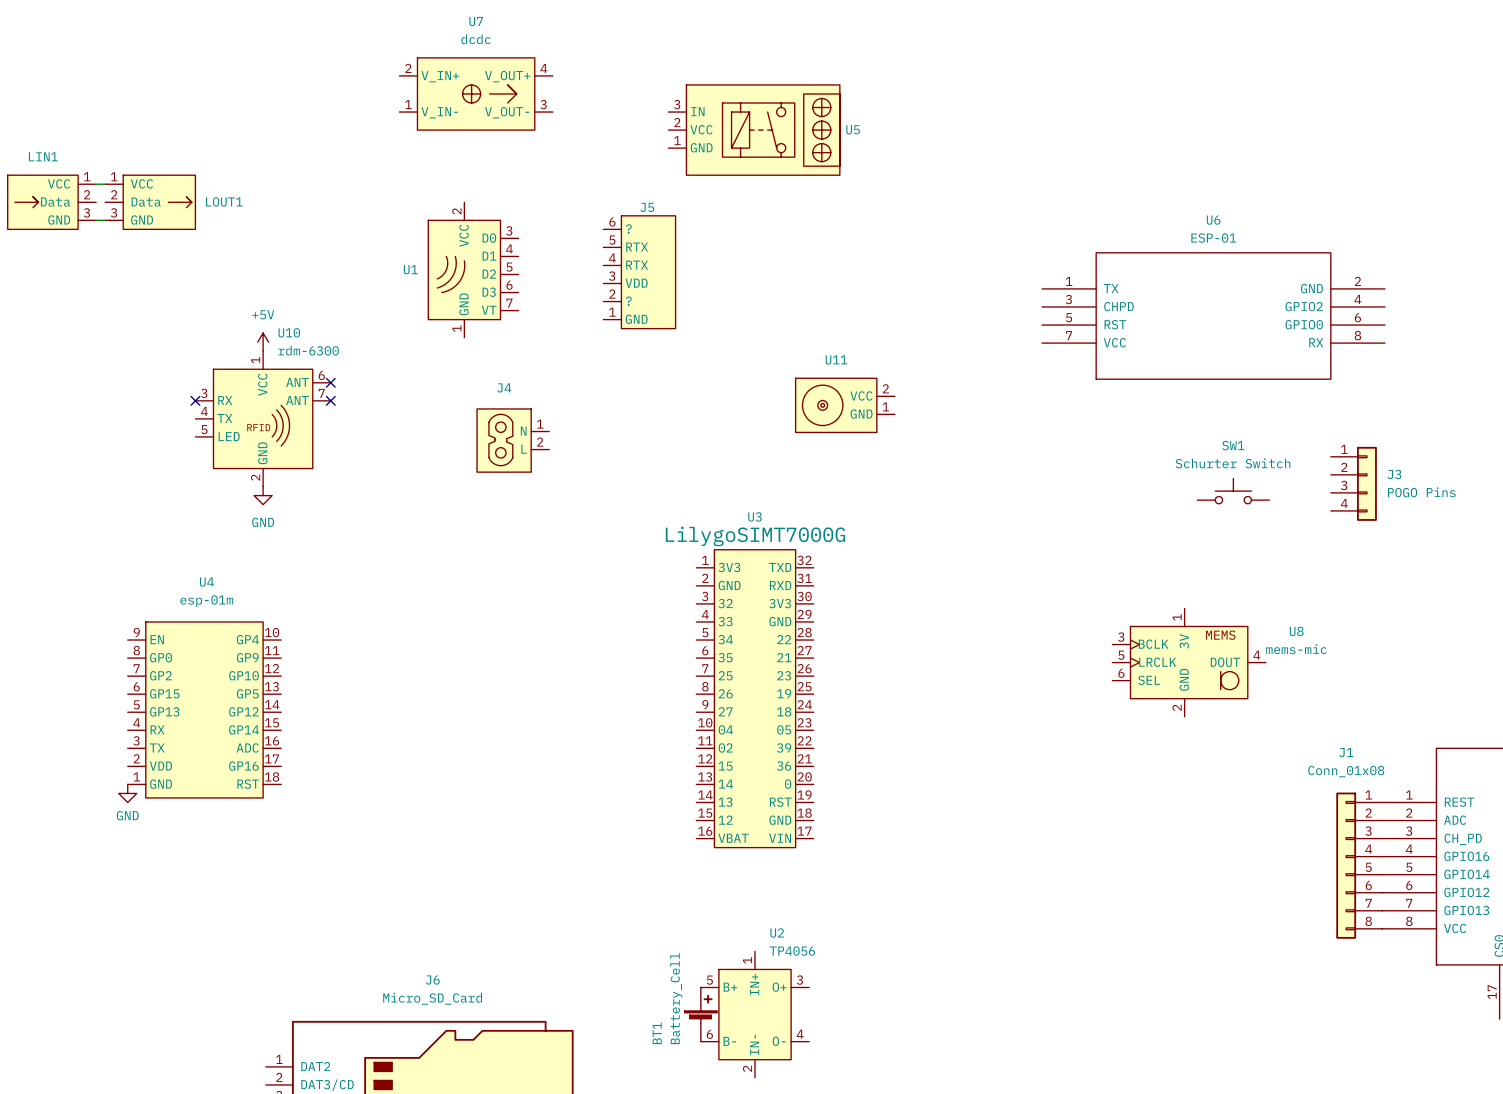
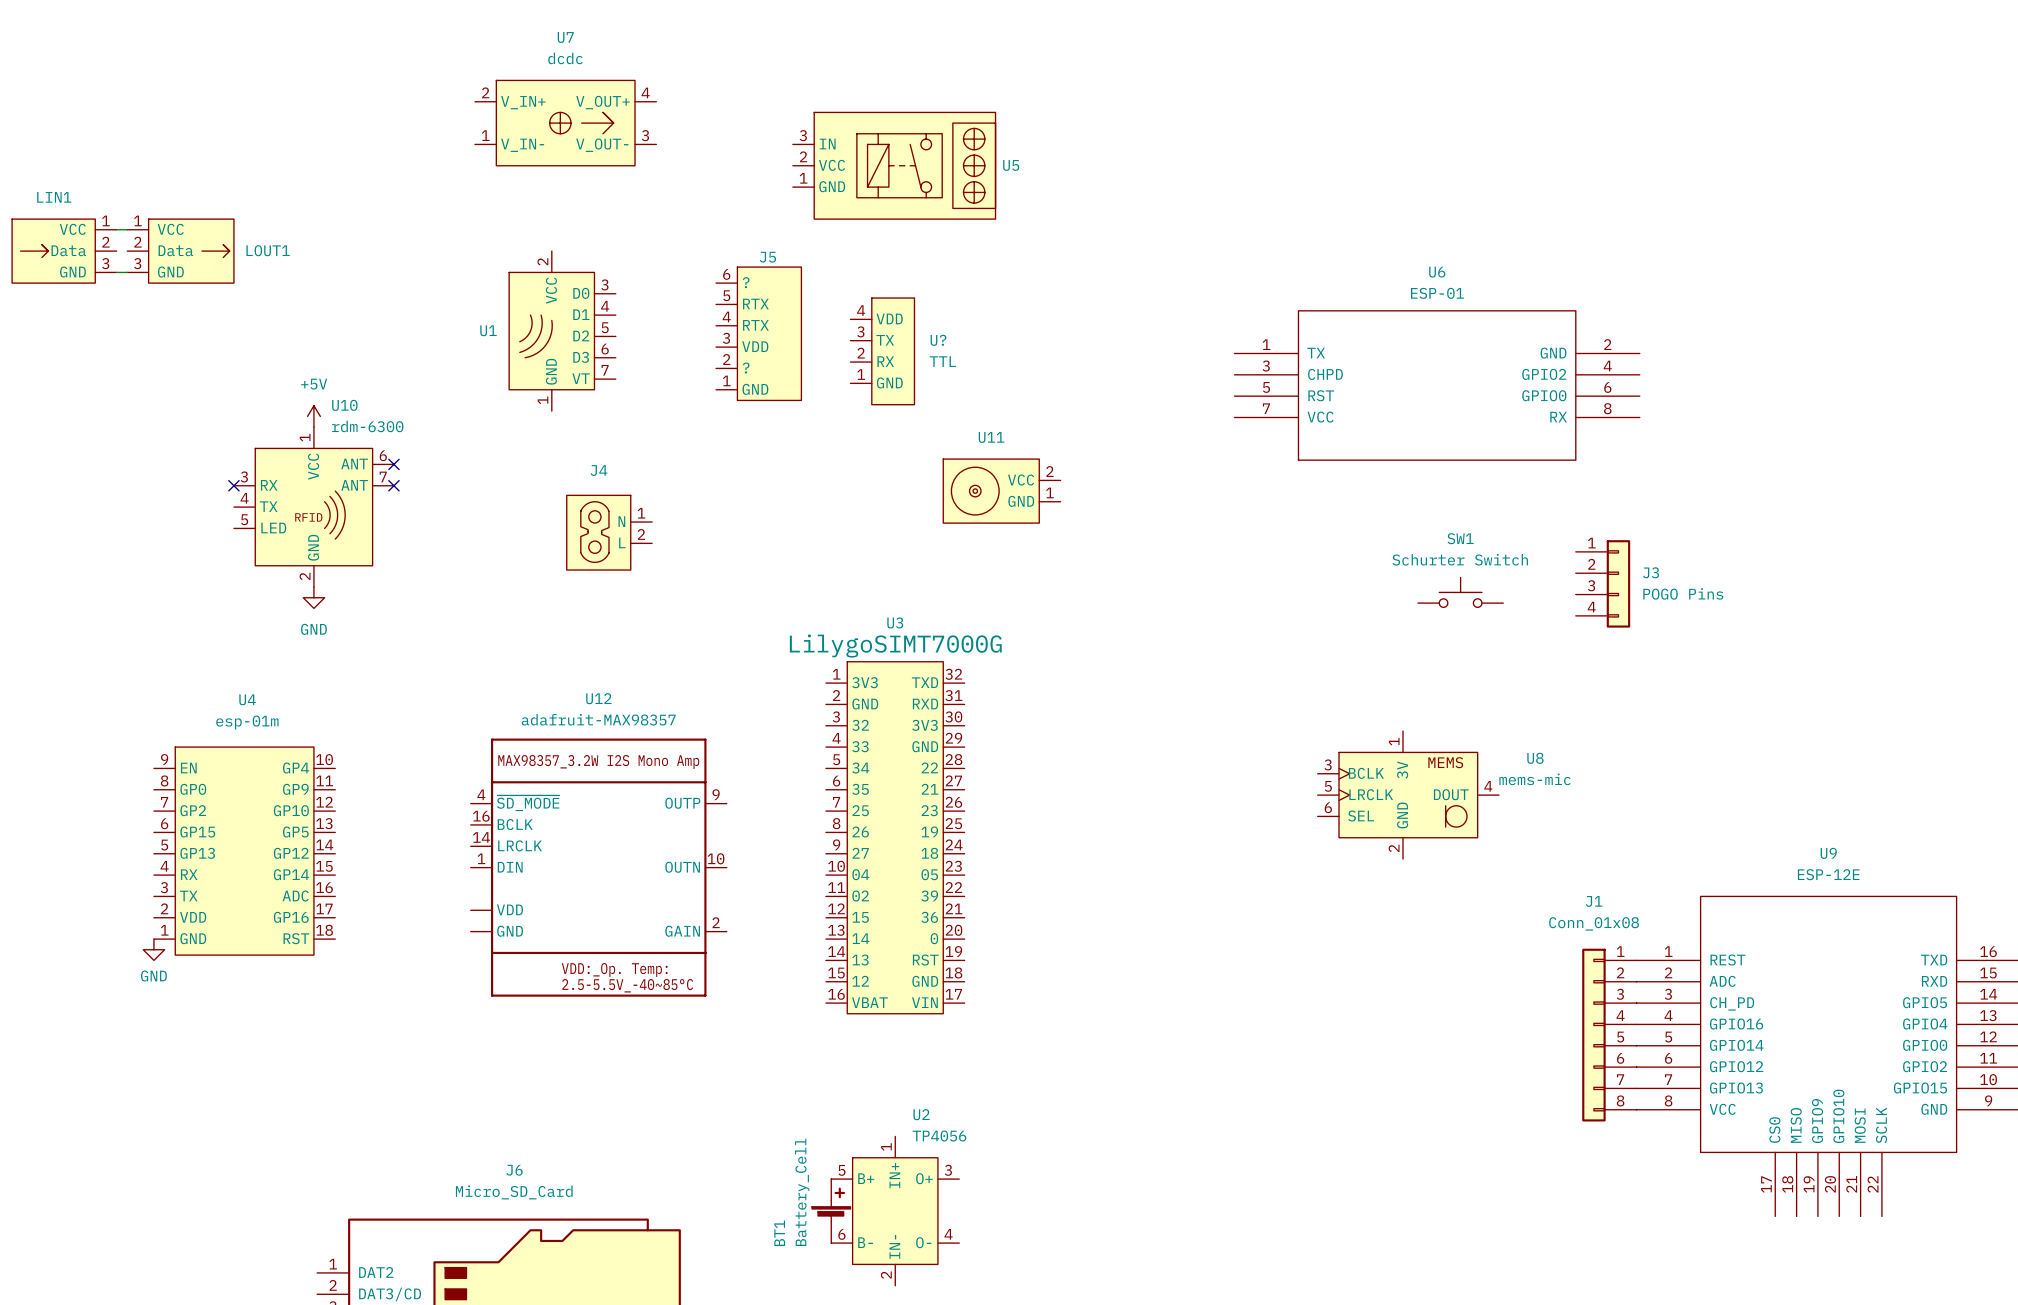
U?: none -> TTL (882, 351)
U12: none -> adafruit-MAX98357 (598, 867)

